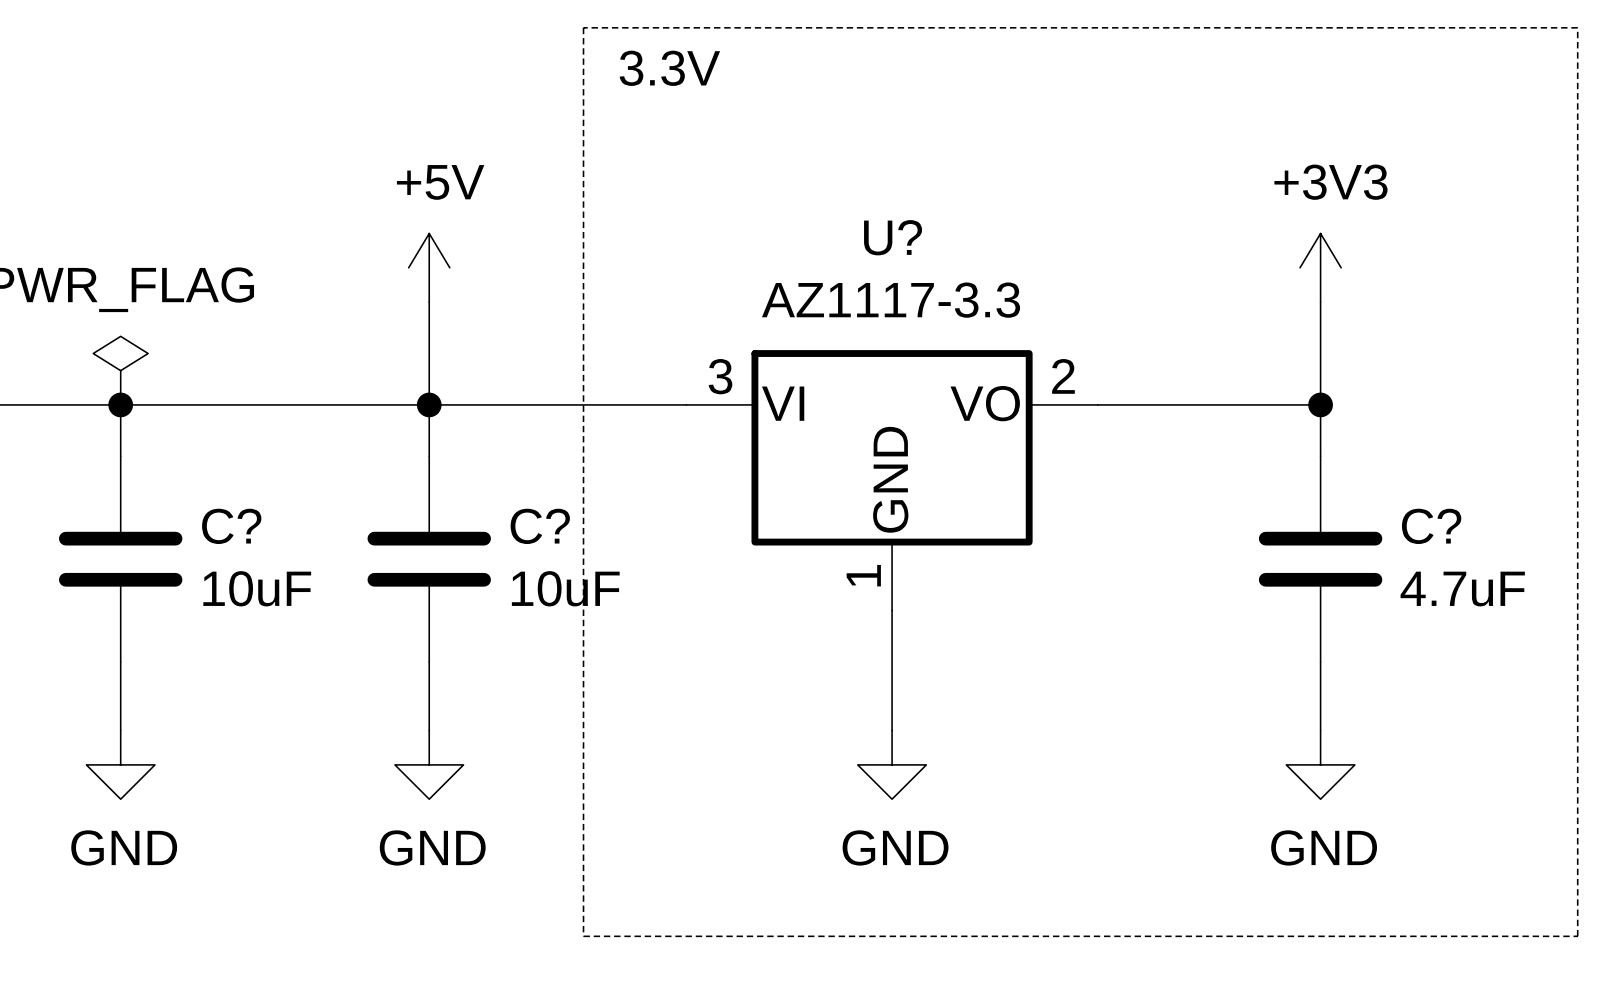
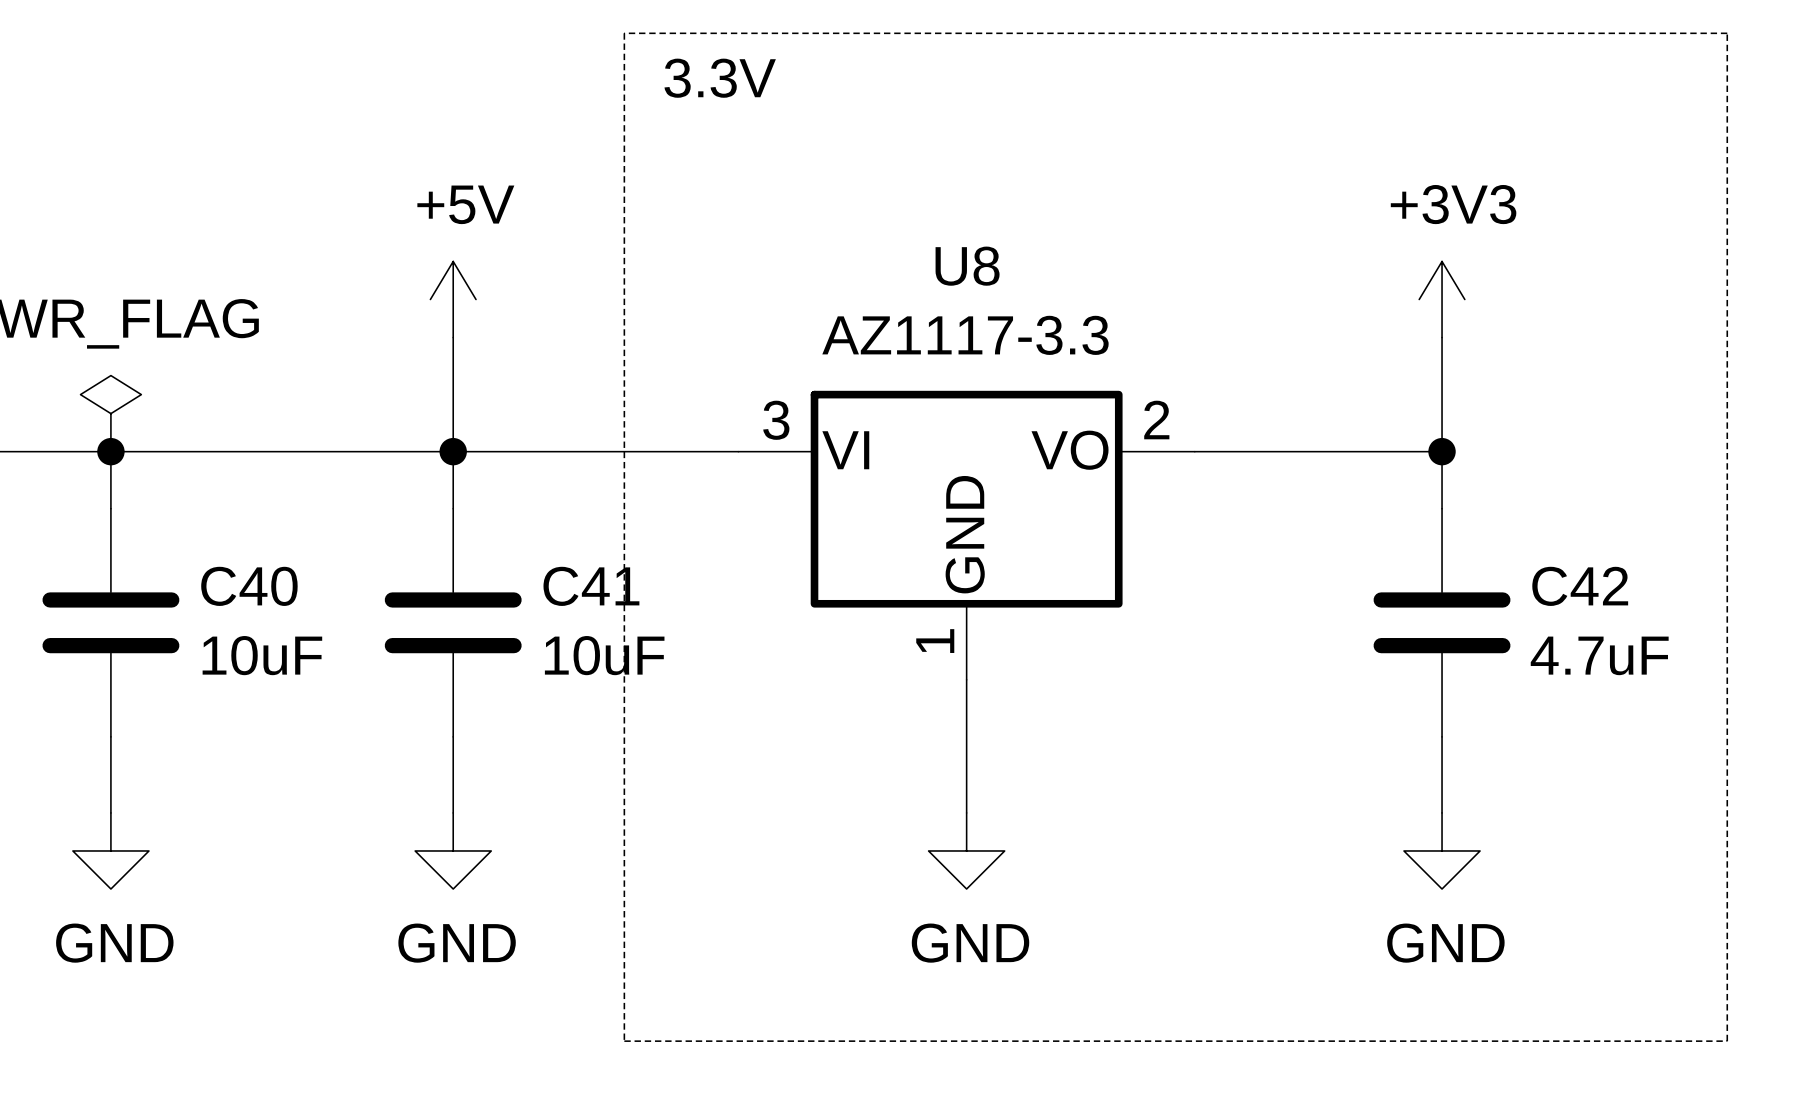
U? name: U? (893, 237) -> U8 (967, 266)
C? name: C? (231, 526) -> C40 (249, 586)
C? name: C? (540, 526) -> C41 (591, 586)
C? name: C? (1431, 526) -> C42 (1580, 586)

